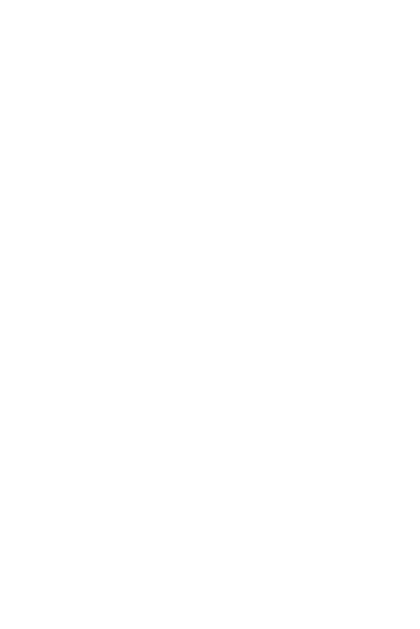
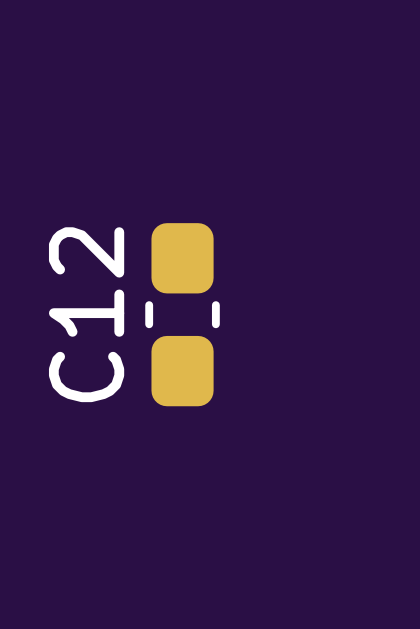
C12: none -> (182, 314)

